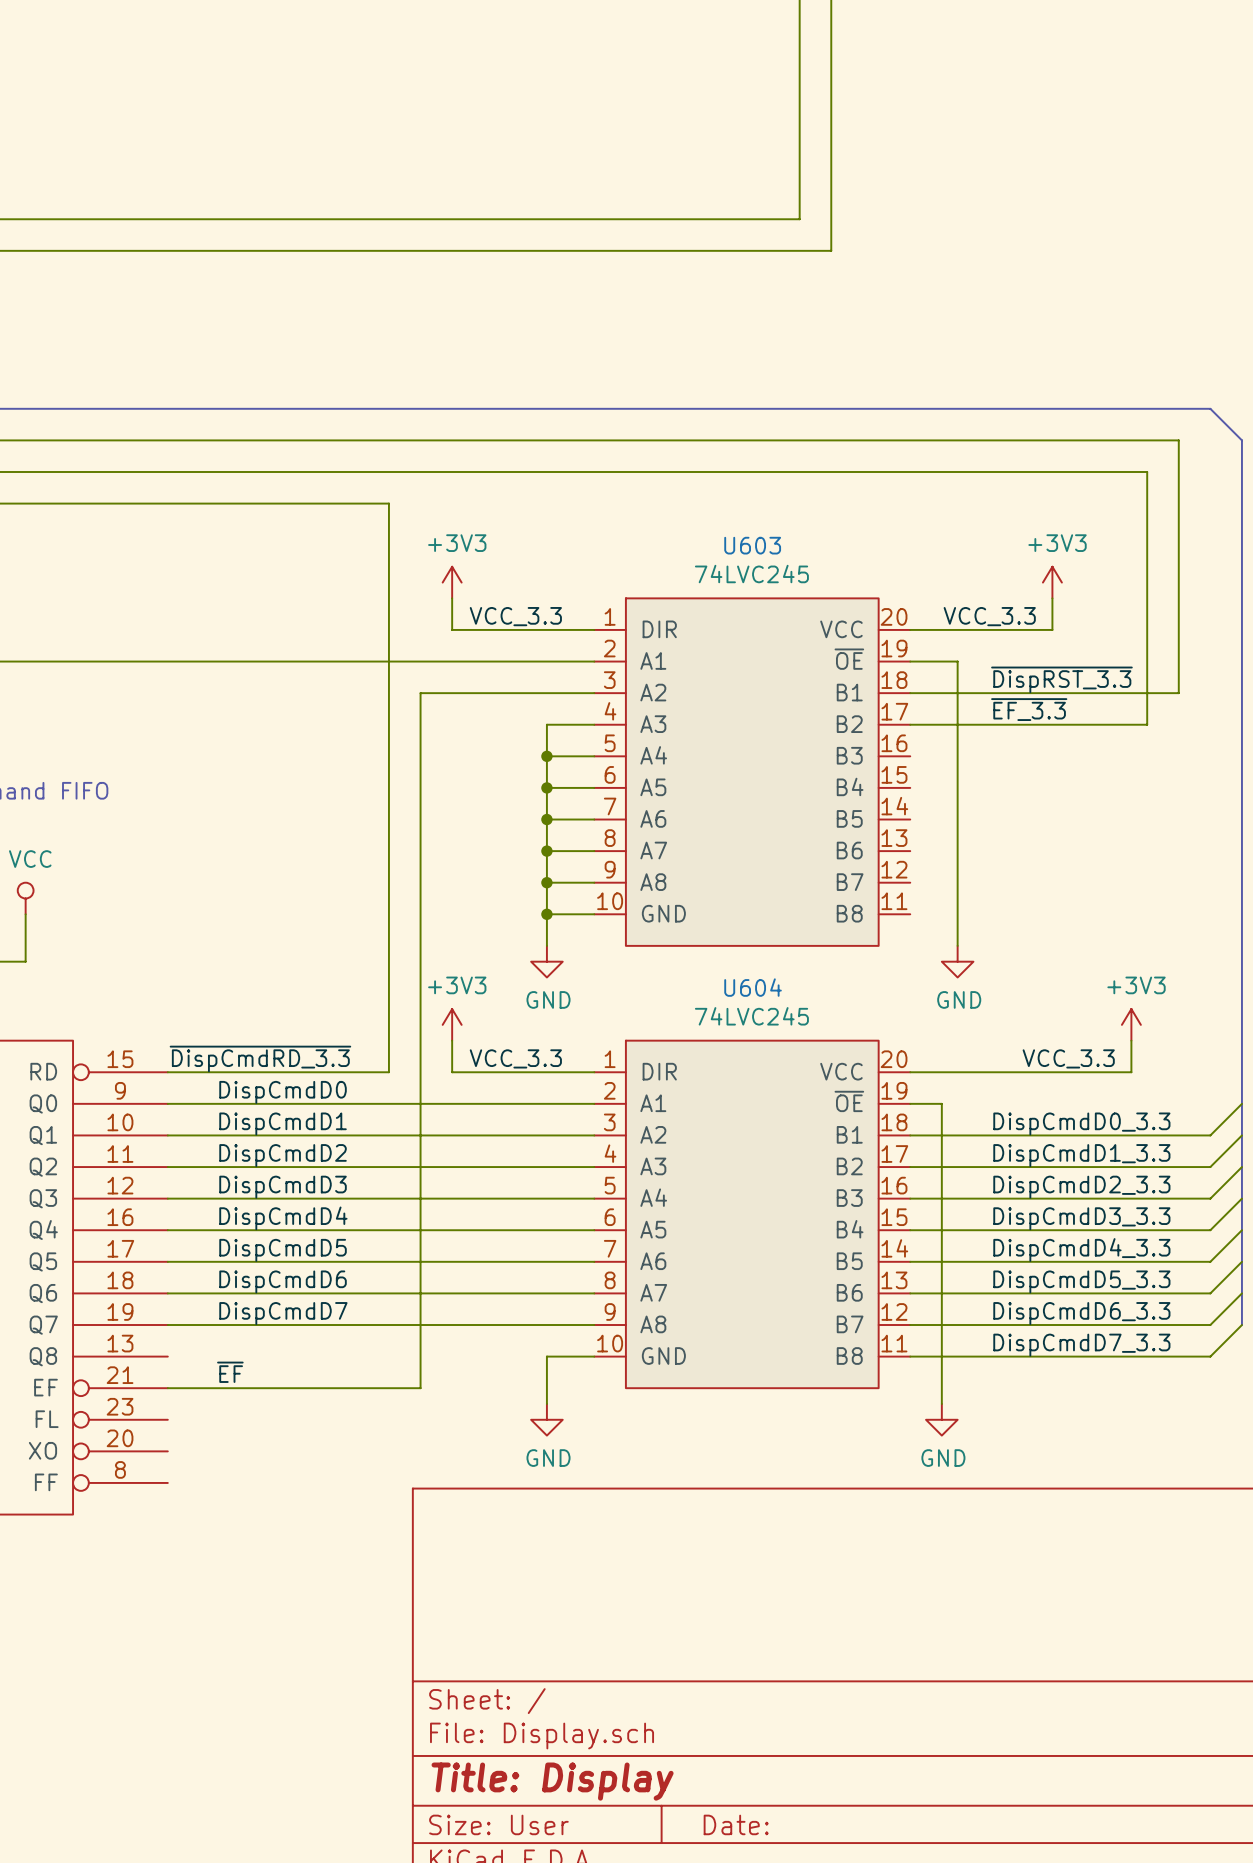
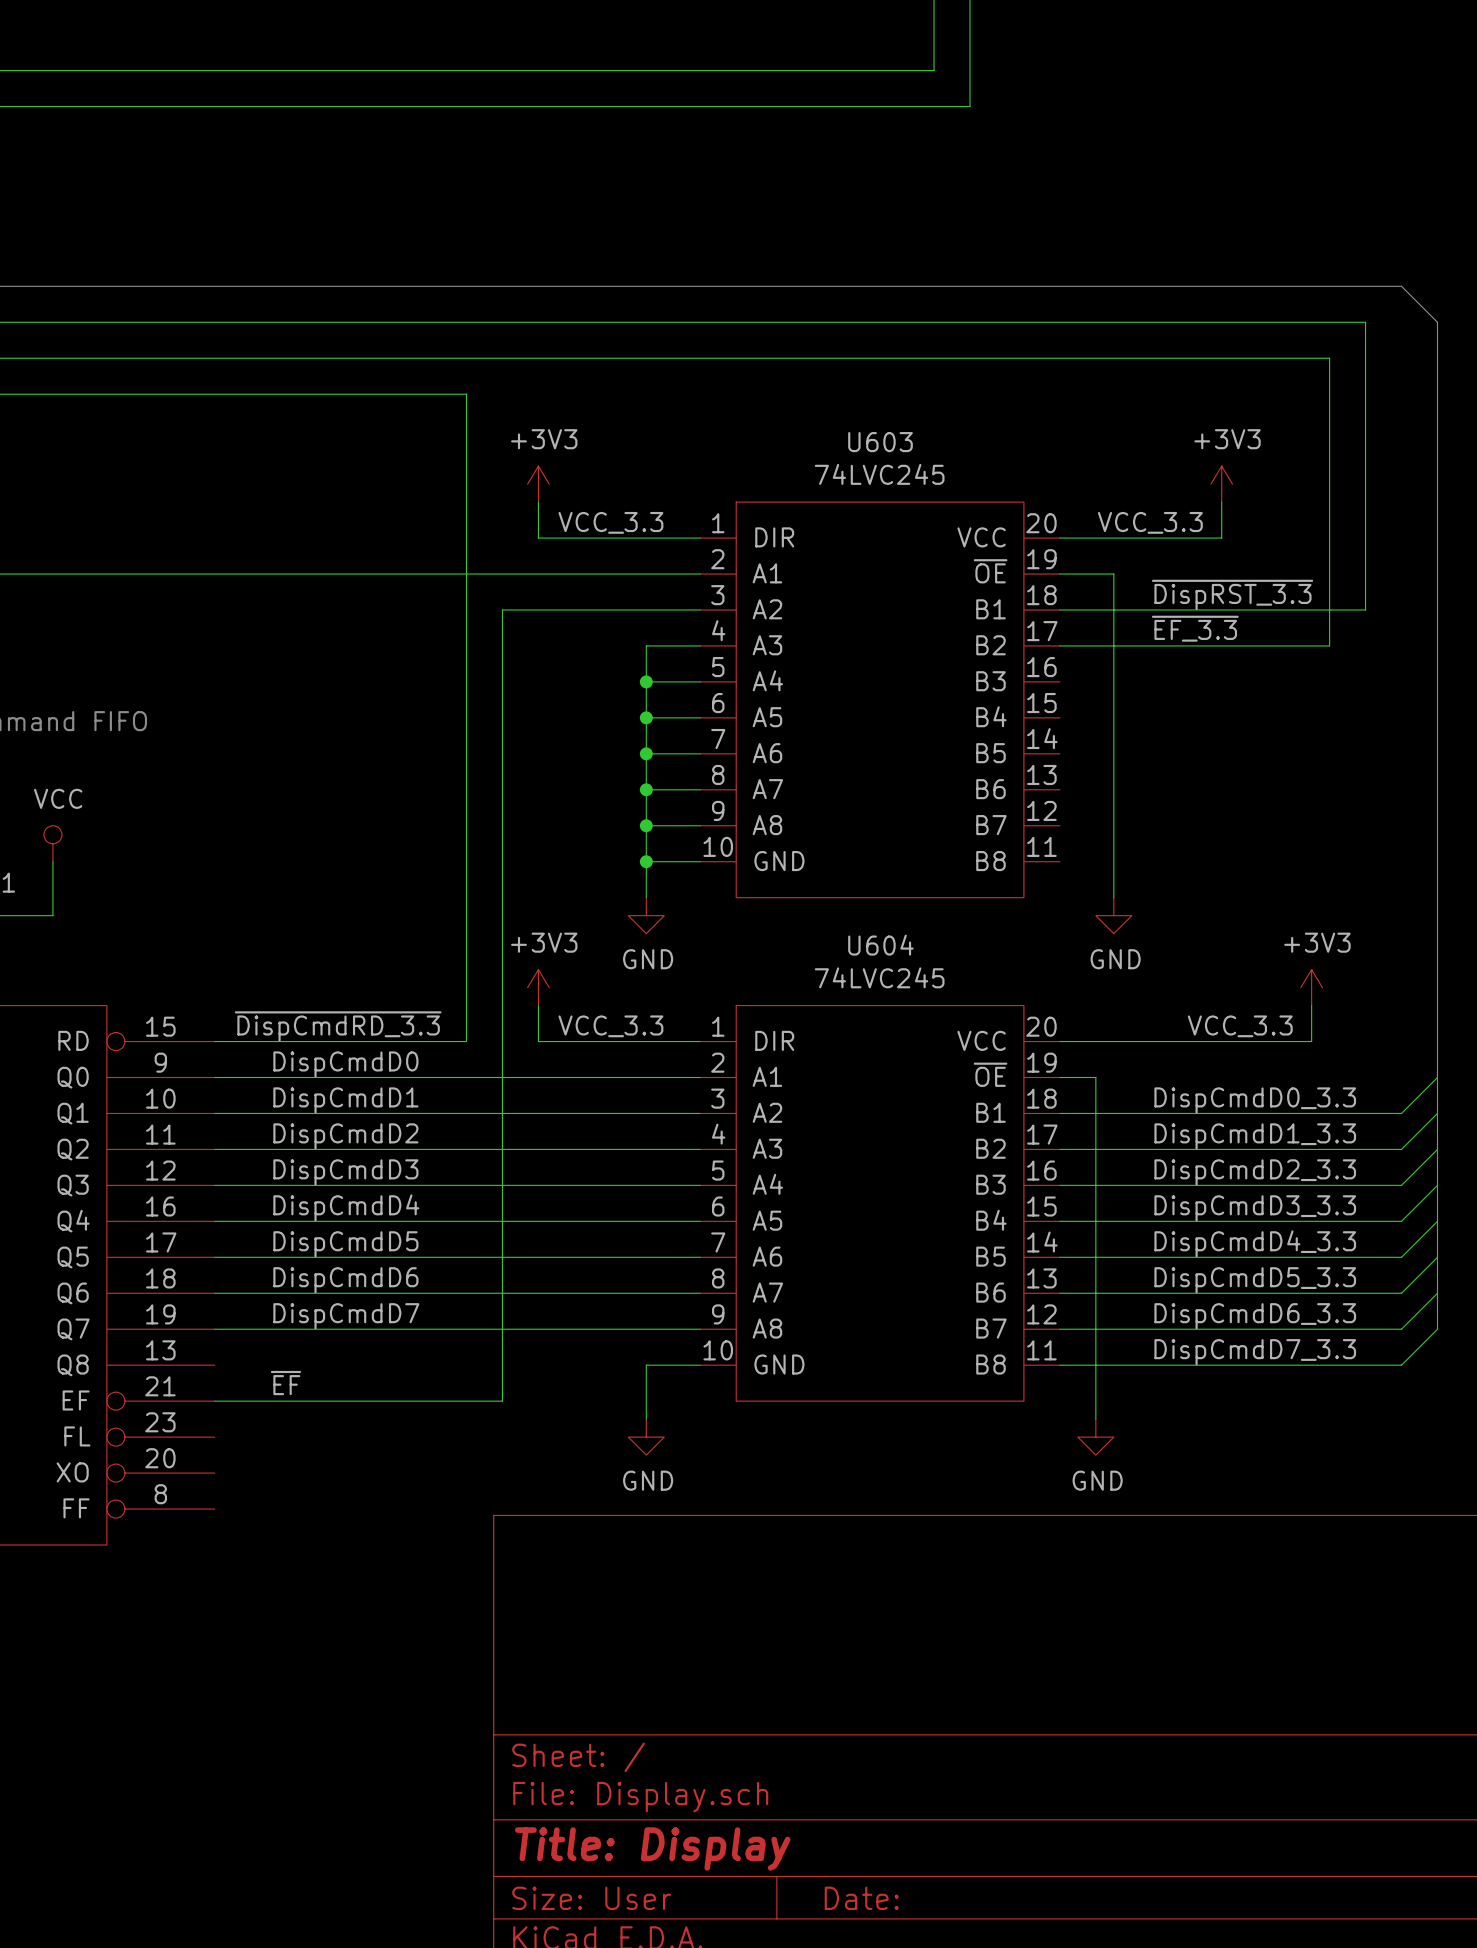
label position: ~{DispCmdRD_3.3} (260, 1058) -> ~{DispCmdRD_3.3} (338, 1026)

